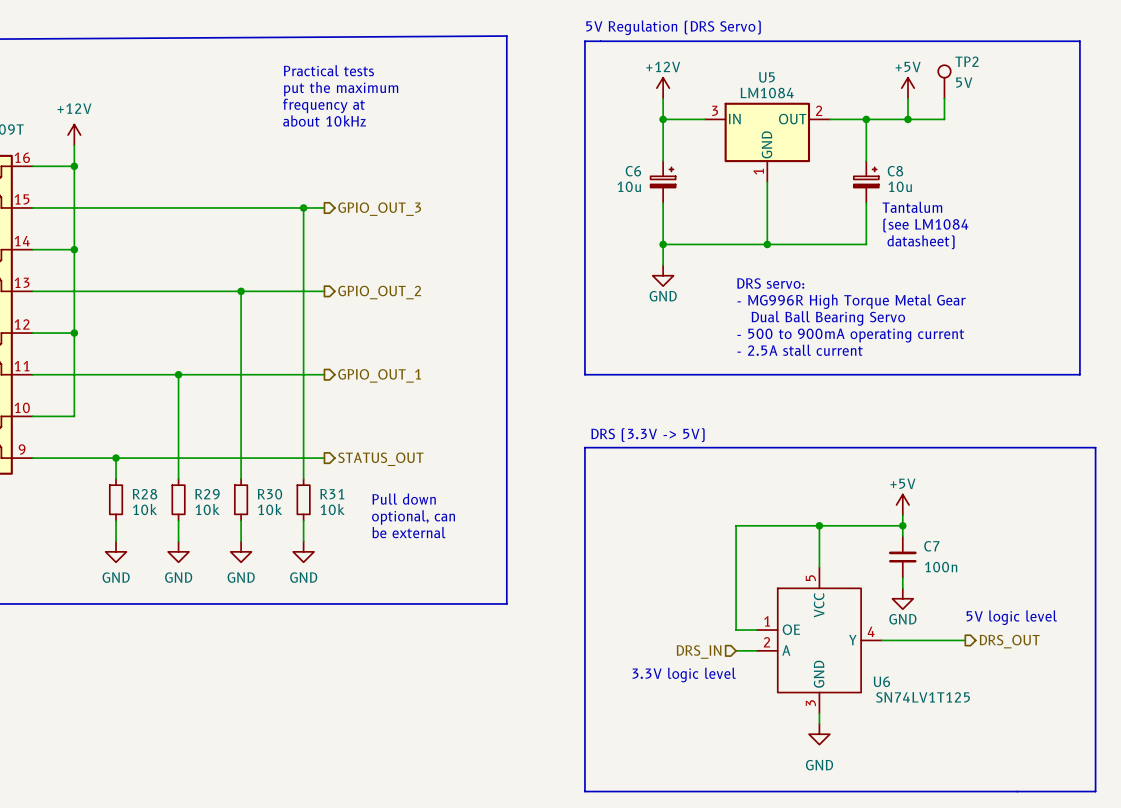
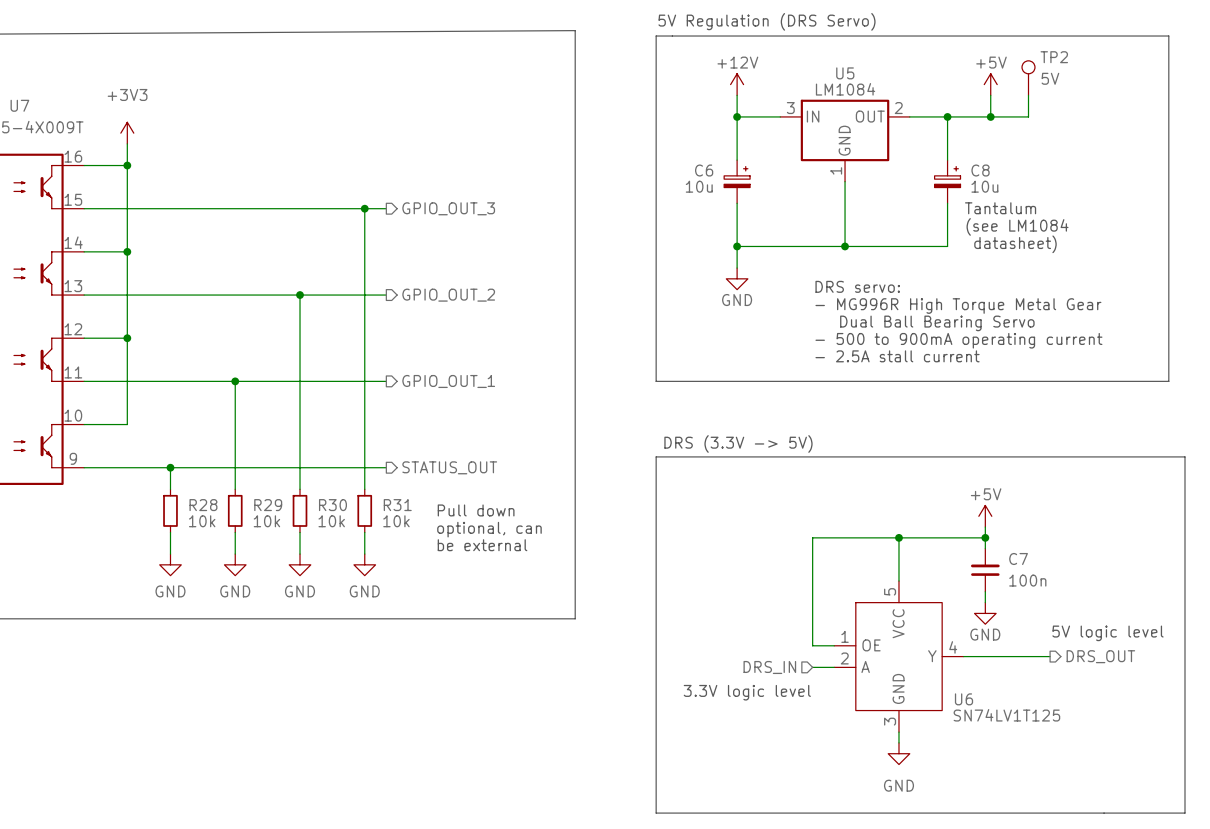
text: Practical tests (328, 70) -> none
text: put the maximum (341, 89) -> none
text: frequency at (323, 105) -> none
text: about 10kHz (324, 121) -> none
power symbol: +12V (74, 135) -> +3V3 (127, 133)

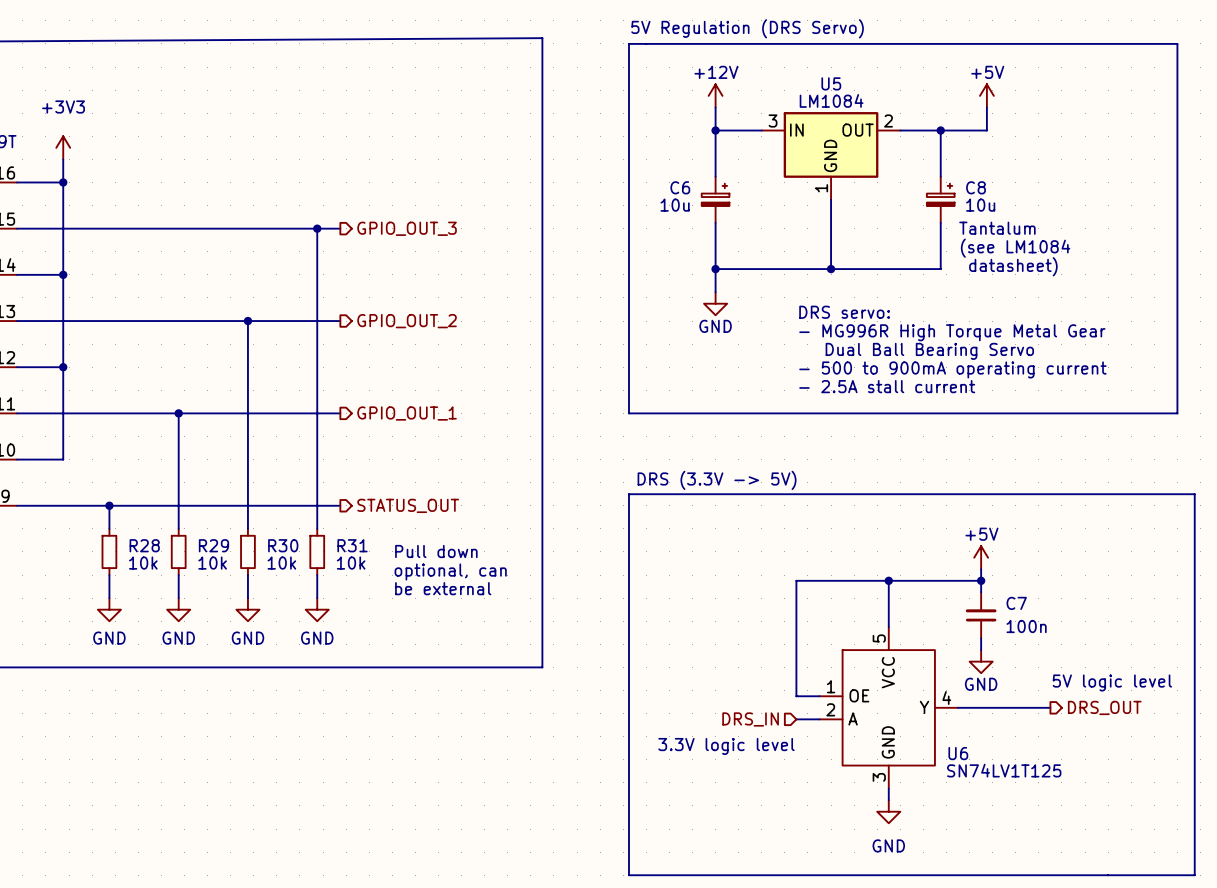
TP2: 5V (1028, 78) -> none
wire: (1028, 95) (1028, 116) (990, 116) -> none
junction: (990, 116) -> none

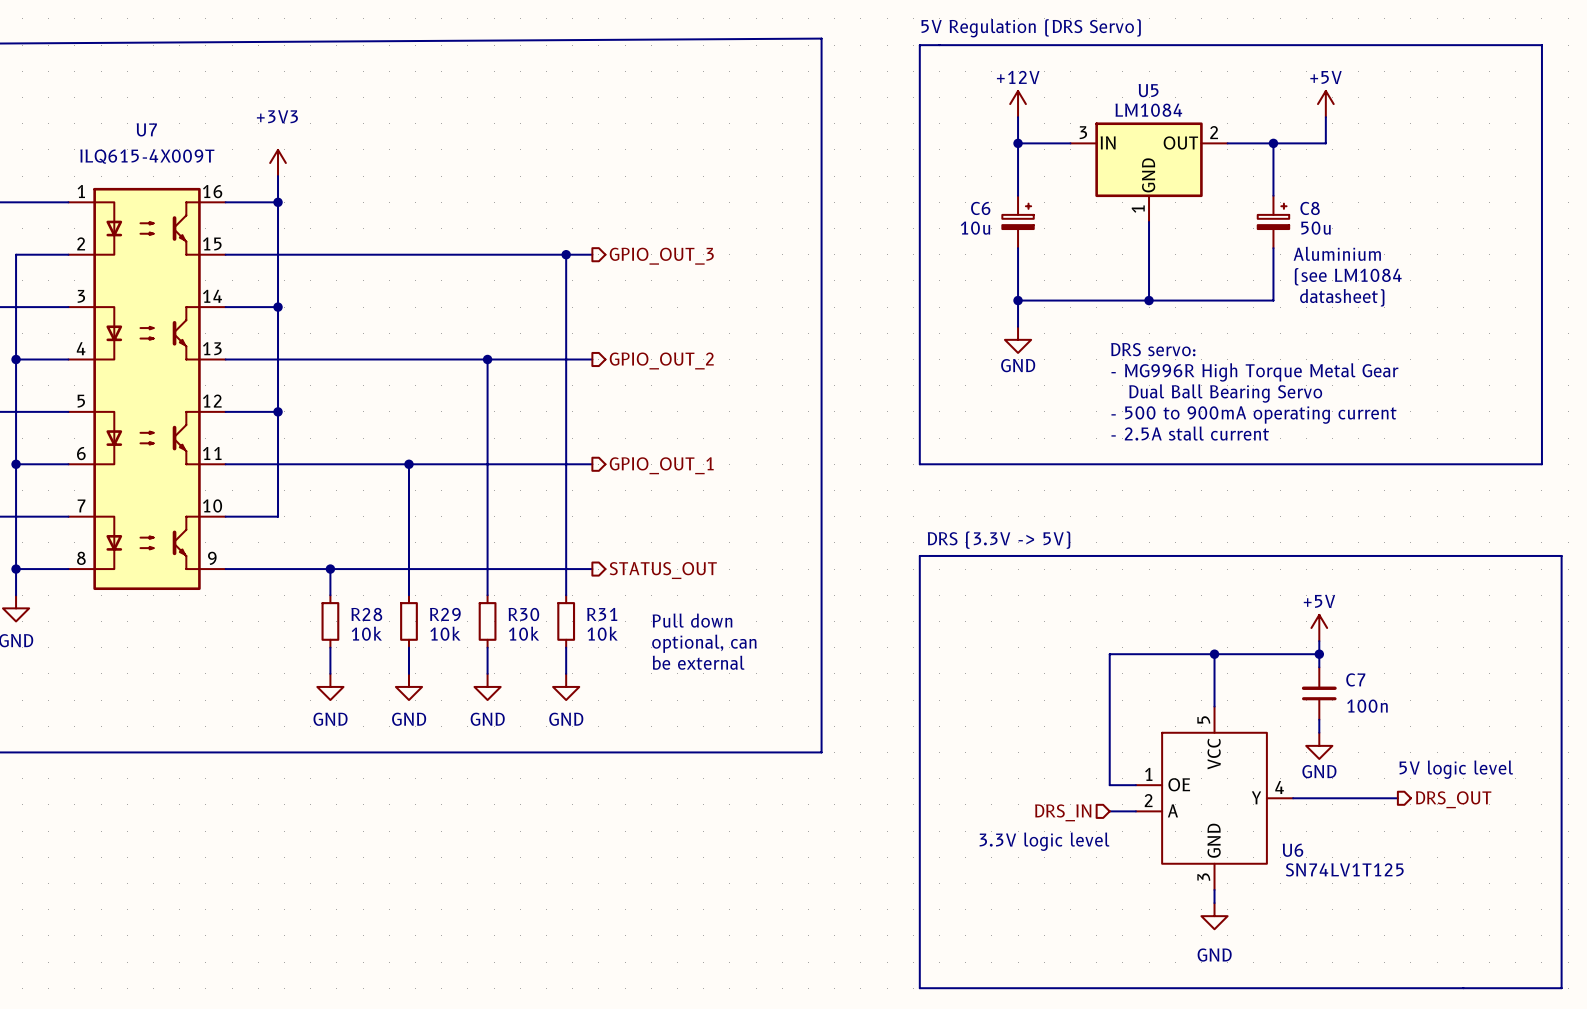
C8 value: 10u (980, 205) -> 50u (1316, 228)
text: Tantalum (997, 228) -> Aluminium (1337, 253)

